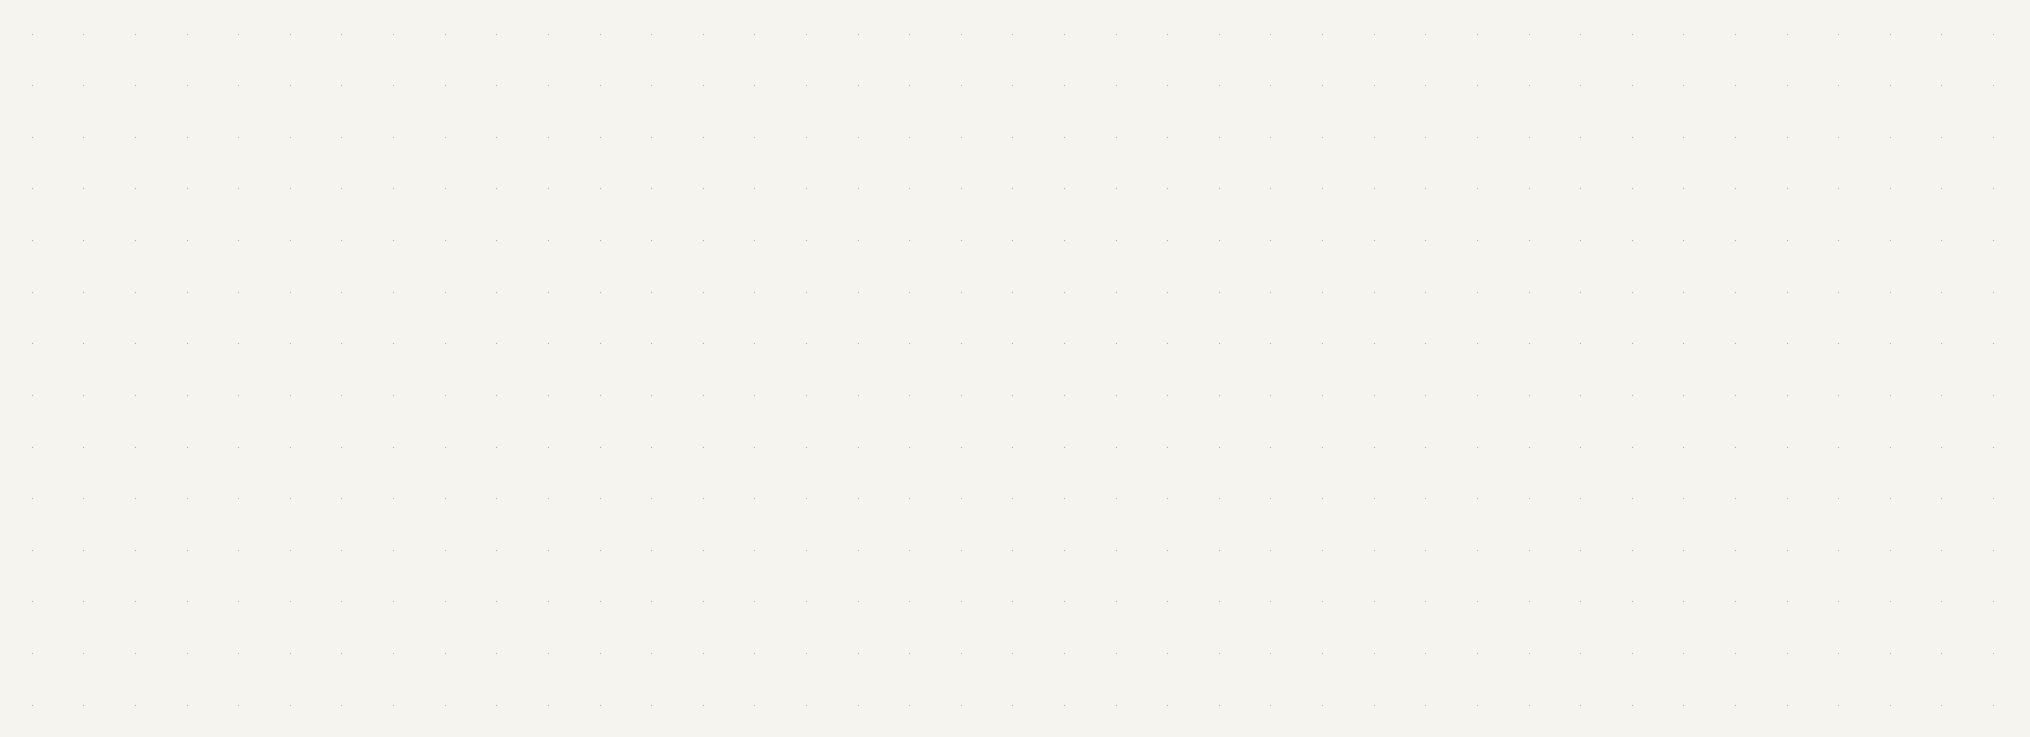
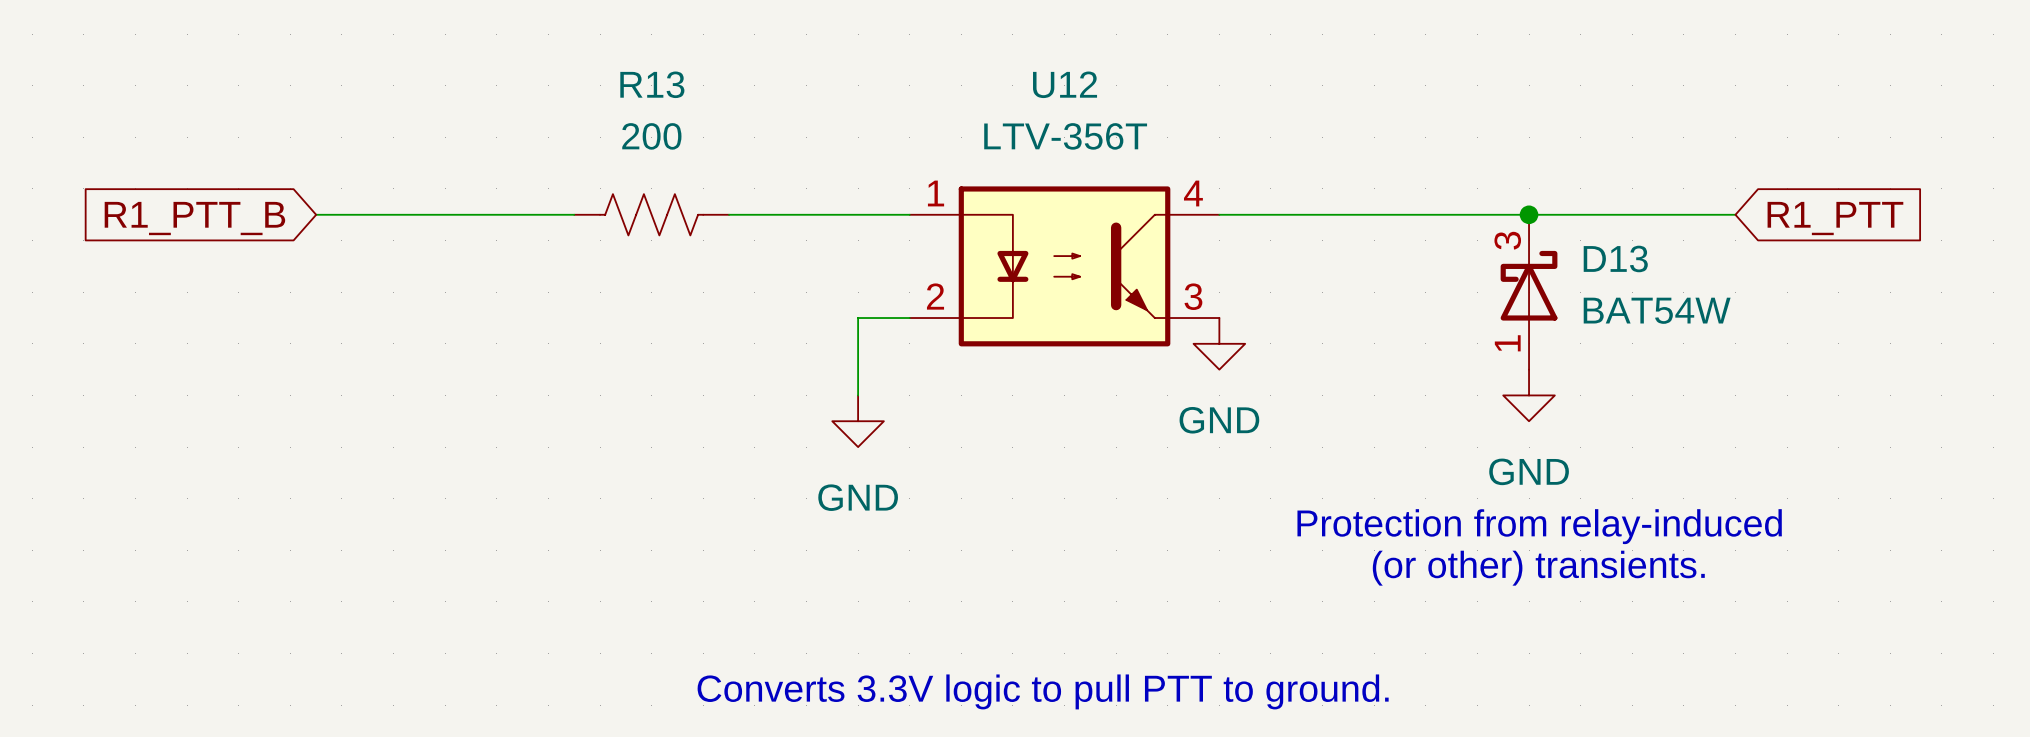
wire: none -> (316, 214) (574, 214)
R13: none -> 200 (651, 214)
wire: none -> (729, 214) (909, 214)
wire: none -> (1219, 214) (1735, 214)
junction: none -> (1529, 214)
global label: none -> R1_PTT_B (194, 218)
global label: none -> R1_PTT (1835, 218)
U12: none -> LTV-356T (1064, 266)
D13: none -> BAT54W (1529, 292)
wire: none -> (909, 318) (858, 318) (858, 395)
power symbol: none -> GND (1219, 343)
power symbol: none -> GND (1529, 395)
power symbol: none -> GND (858, 421)
text: none -> Protection from relay-induced (1539, 526)
text: none -> (or other) transients. (1538, 568)
text: none -> Converts 3.3V logic to pull PTT to ground. (1043, 691)

